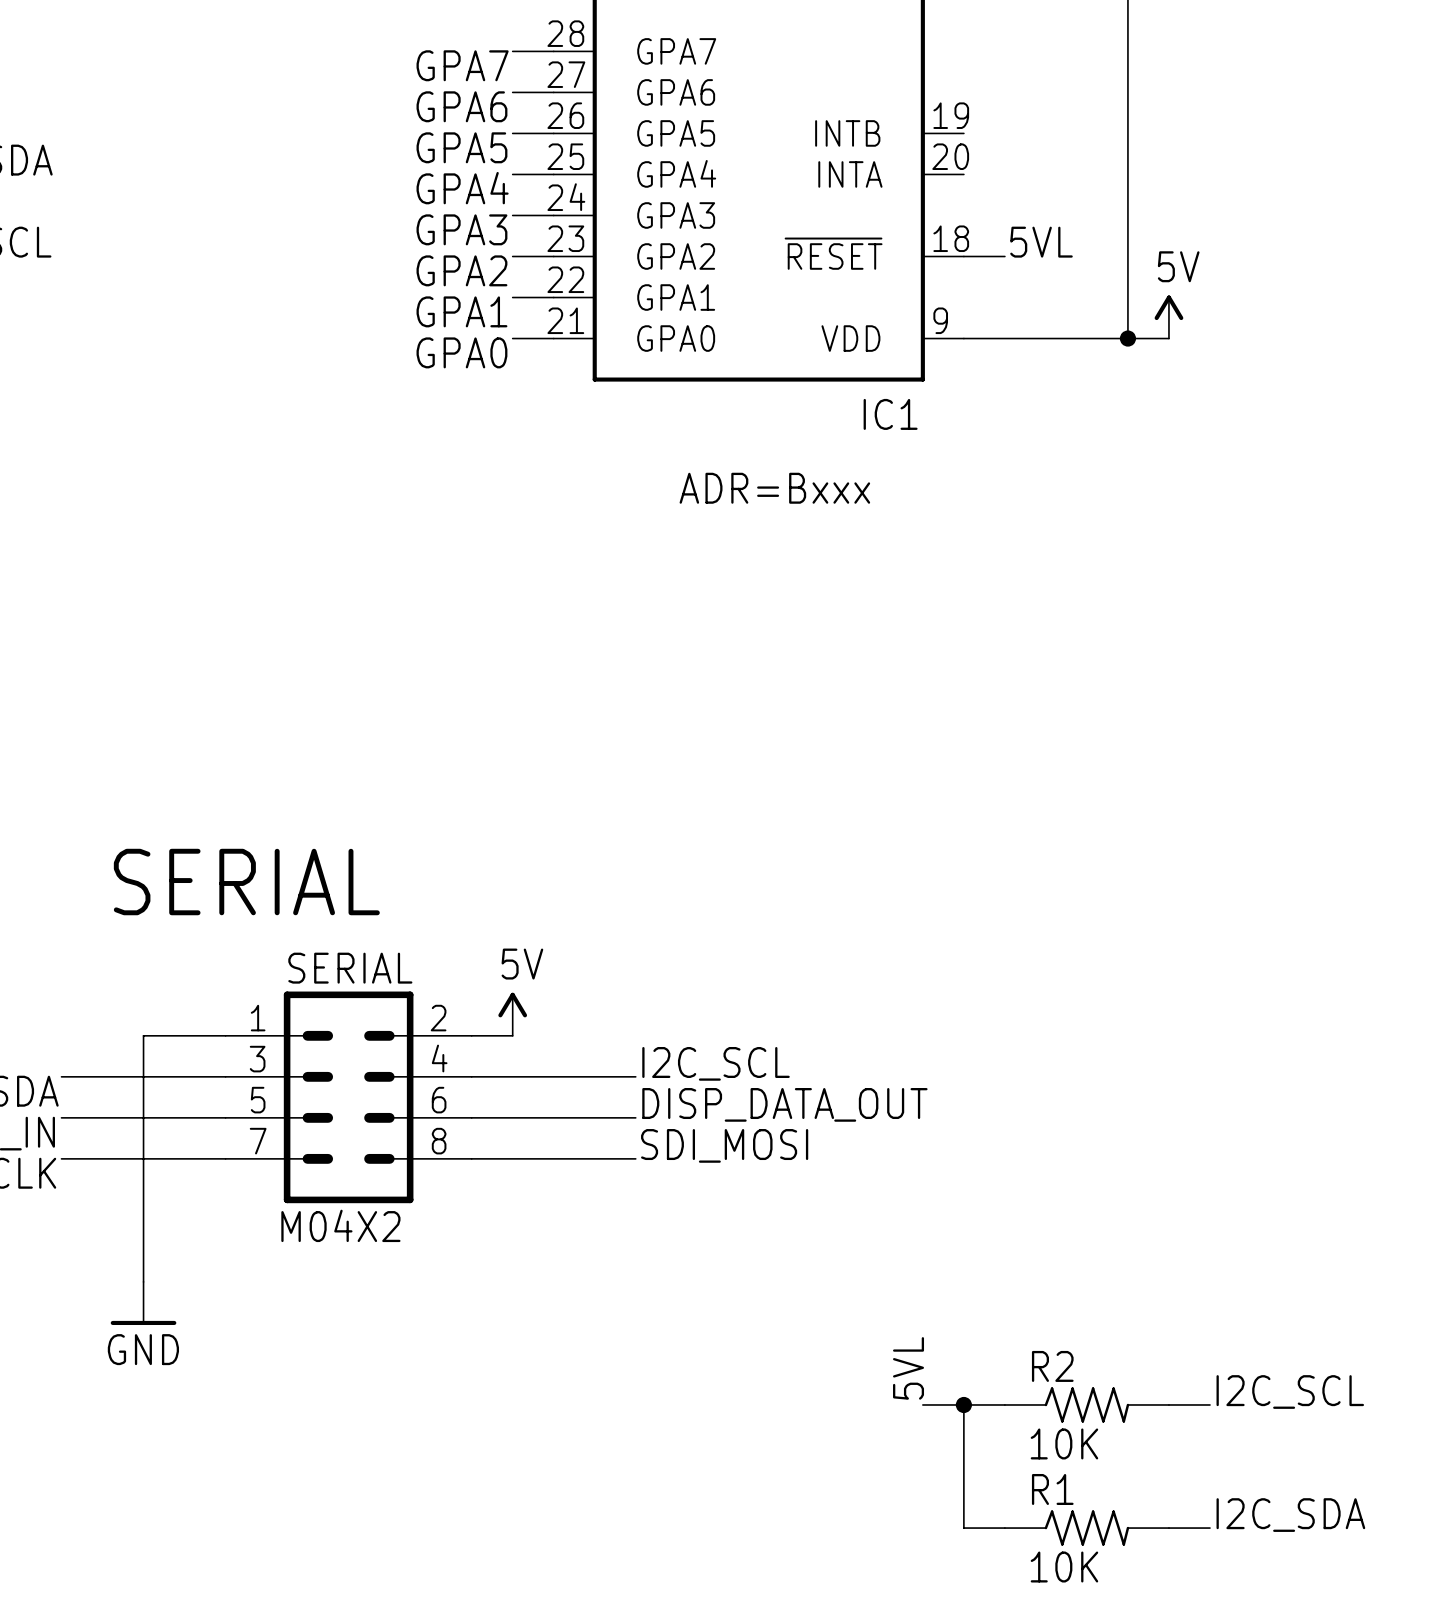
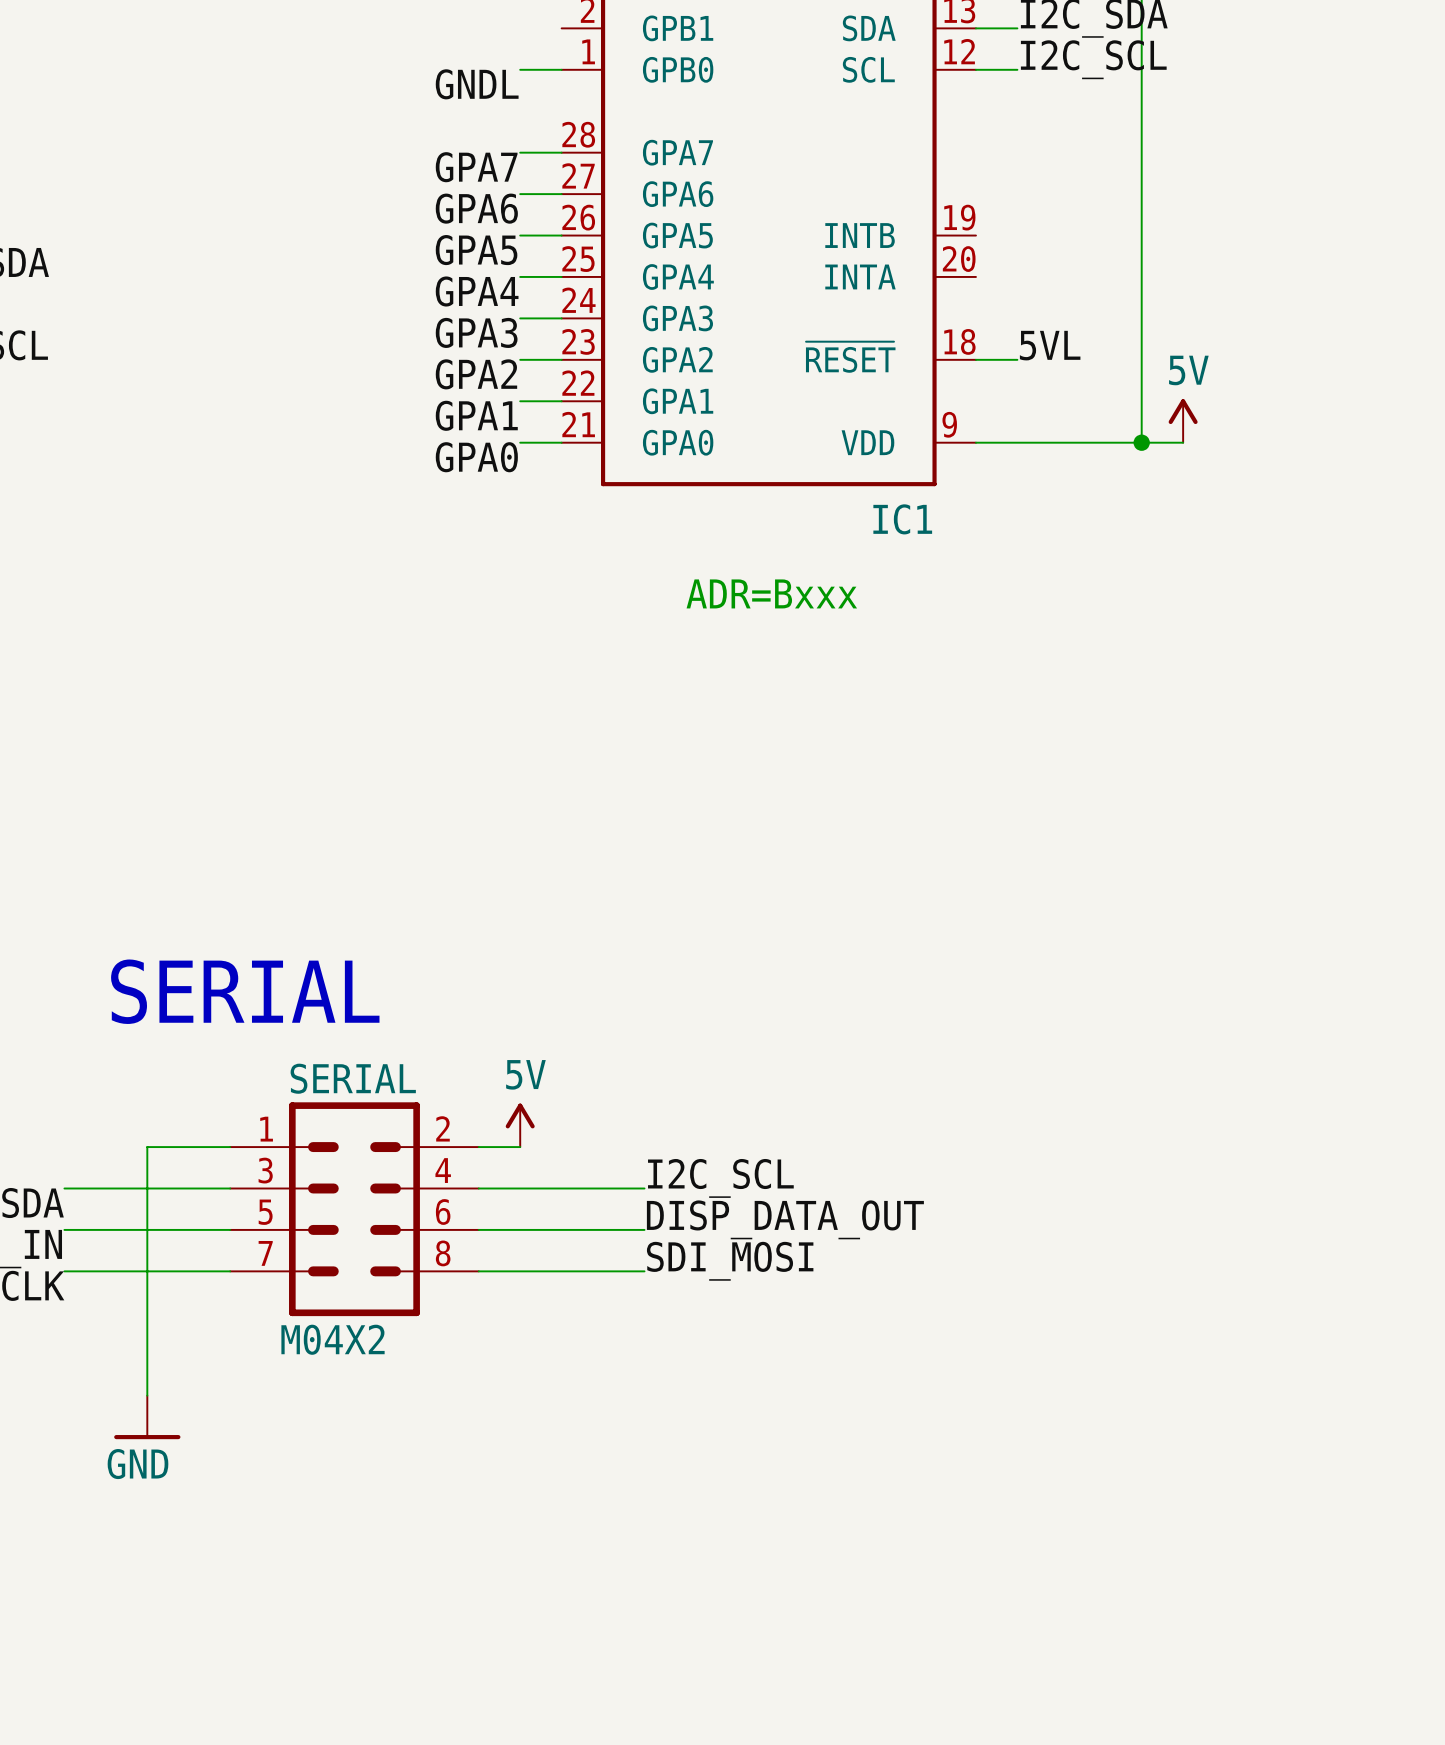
label: 5VL (908, 1368) -> none
label: I2C_SCL (1290, 1392) -> none
wire: (922, 1404) (1004, 1404) -> none
wire: (963, 1404) (963, 1528) (1004, 1528) -> none
junction: (963, 1404) -> none
R2: 10K (1086, 1404) -> none
wire: (1168, 1404) (1209, 1404) -> none
label: I2C_SDA (1290, 1515) -> none
R1: 10K (1086, 1528) -> none
wire: (1168, 1528) (1209, 1528) -> none

